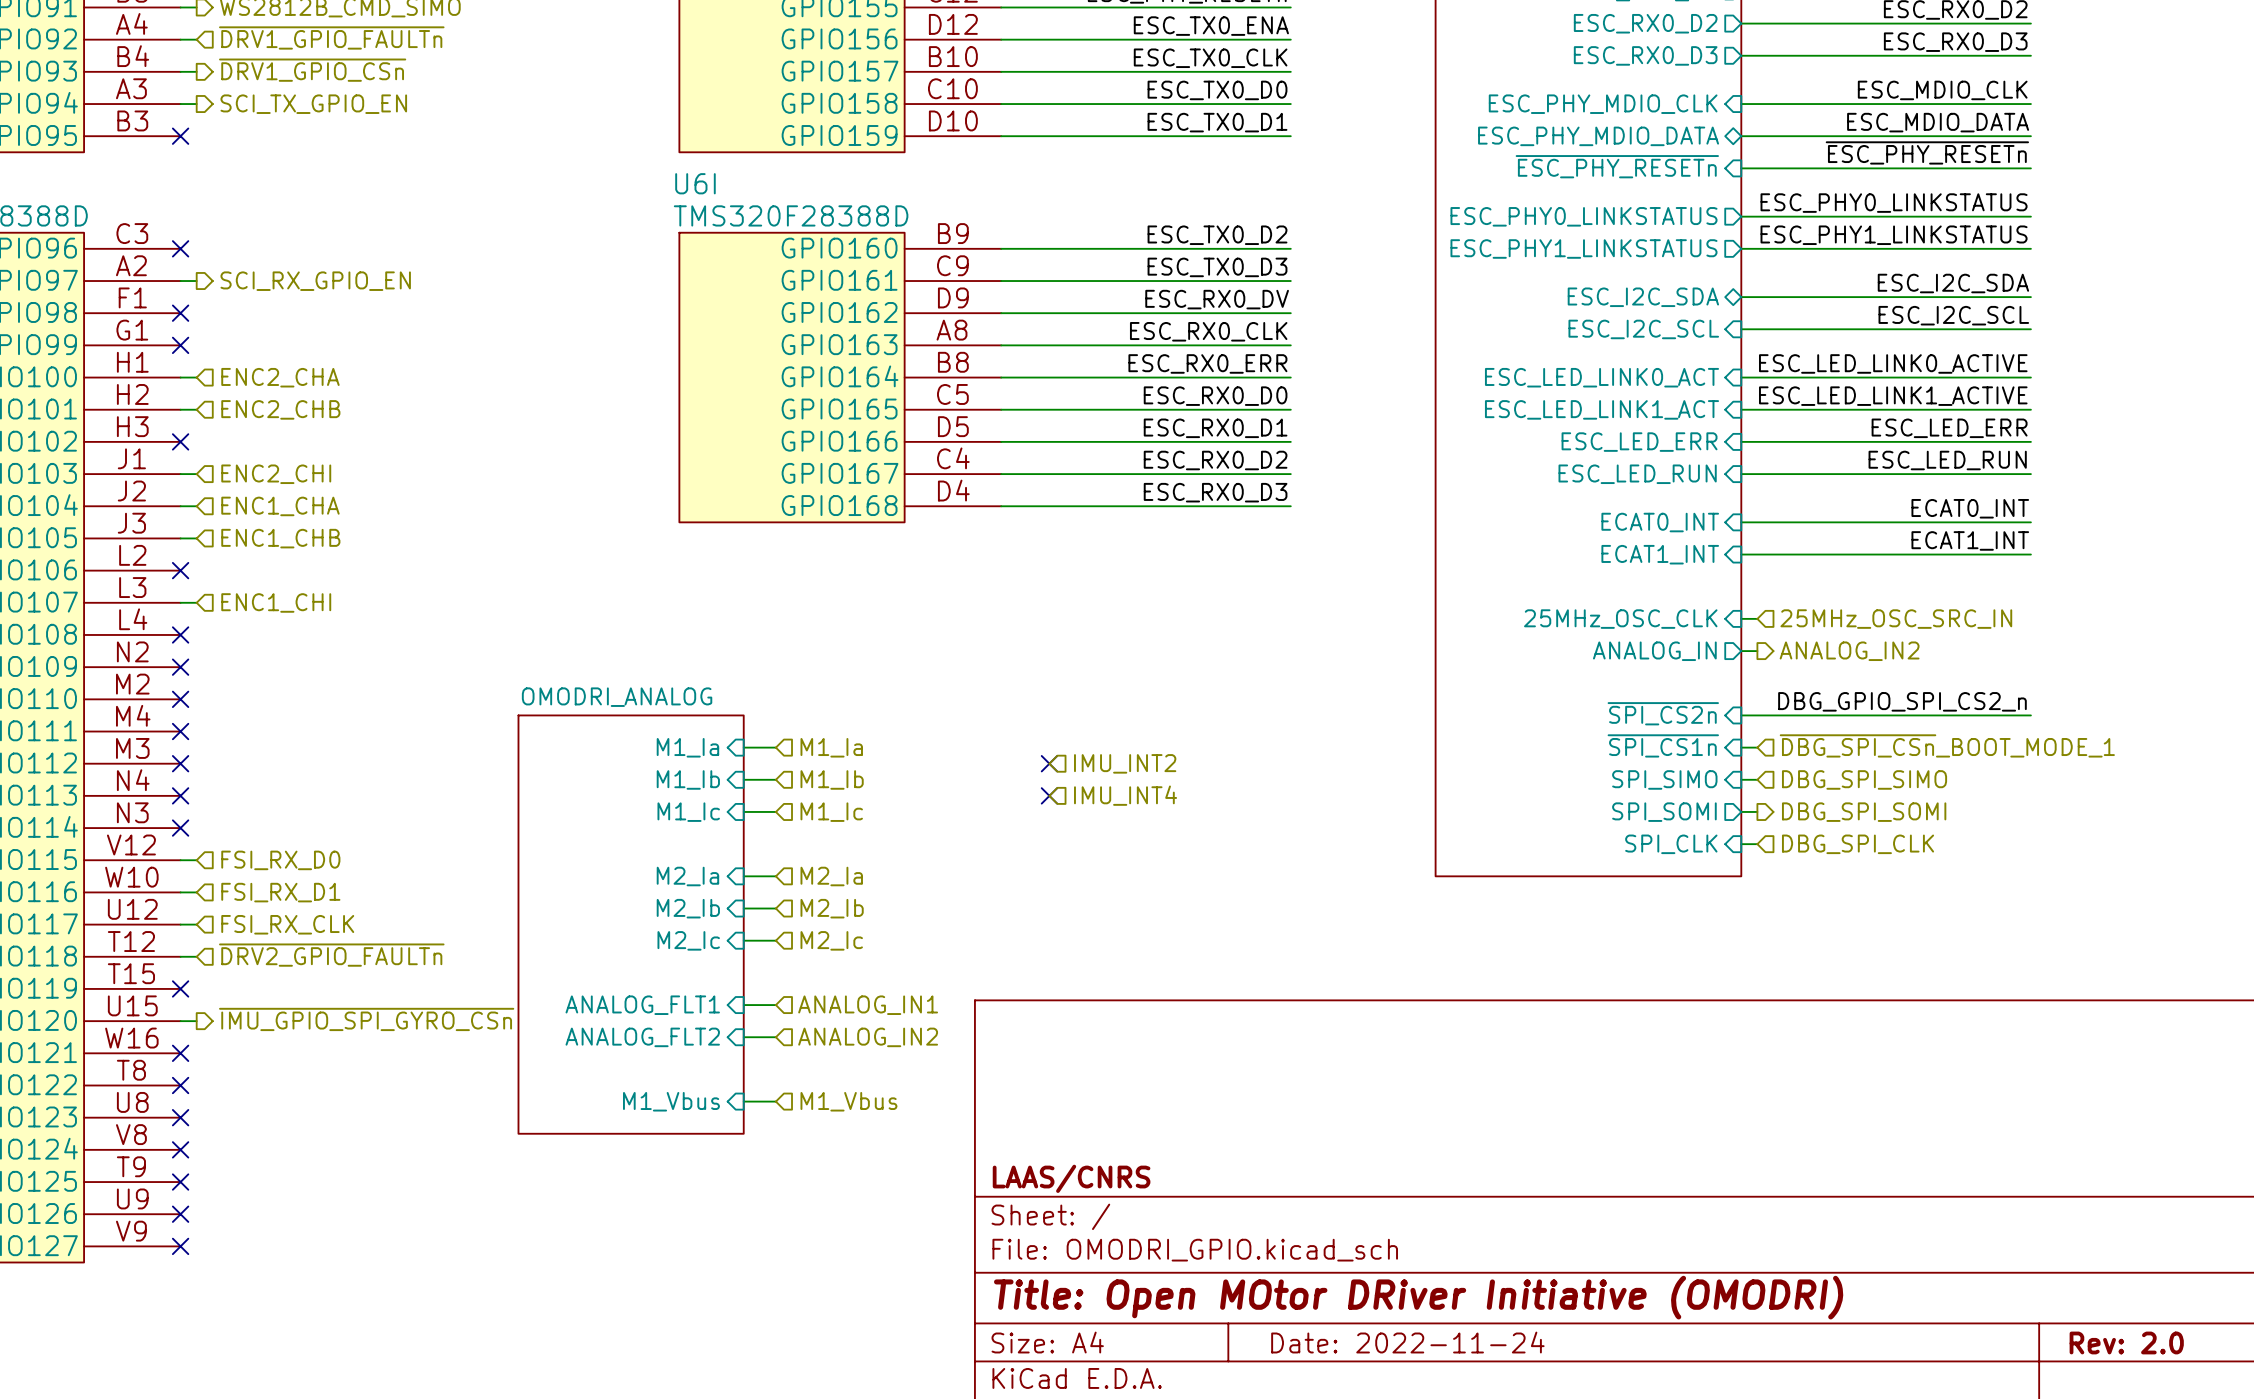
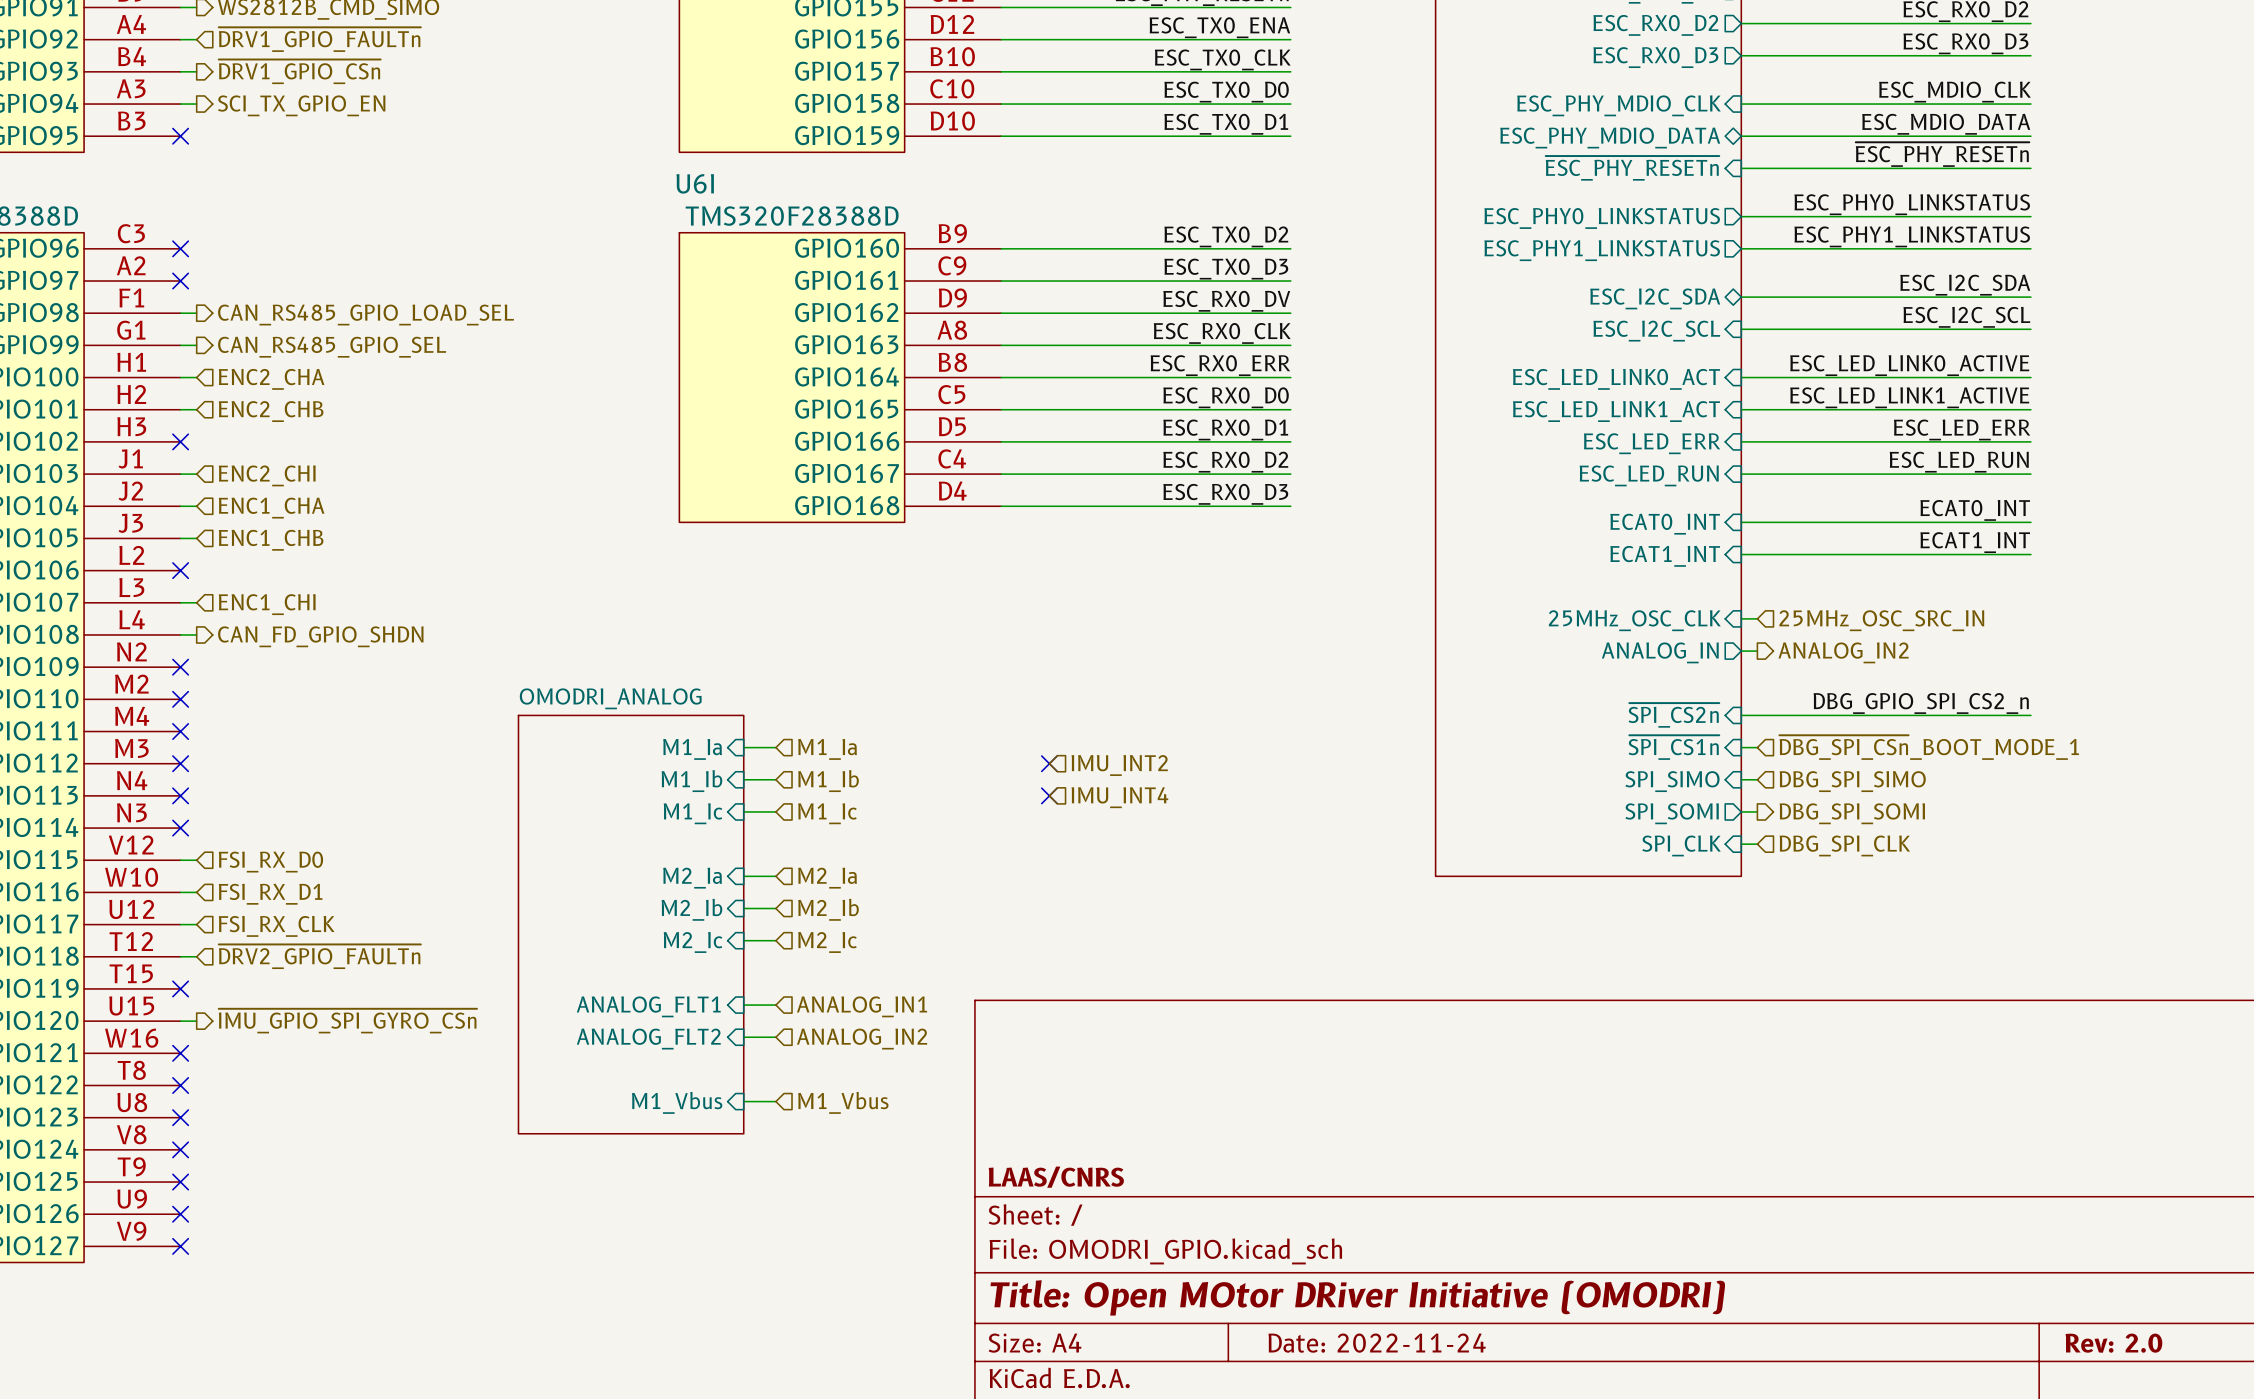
wire: (180, 281) (196, 281) -> (180, 313) (196, 313)
no-connect mark: none -> (180, 281)
hierarchical label: SCI_RX_GPIO_EN (315, 281) -> none
hierarchical label: none -> CAN_RS485_GPIO_LOAD_SEL (366, 314)
no-connect mark: (180, 313) -> none
wire: none -> (180, 345) (196, 345)
no-connect mark: (180, 345) -> none
hierarchical label: none -> CAN_RS485_GPIO_SEL (332, 347)
wire: none -> (180, 634) (196, 634)
no-connect mark: (180, 634) -> none
hierarchical label: none -> CAN_FD_GPIO_SHDN (320, 636)

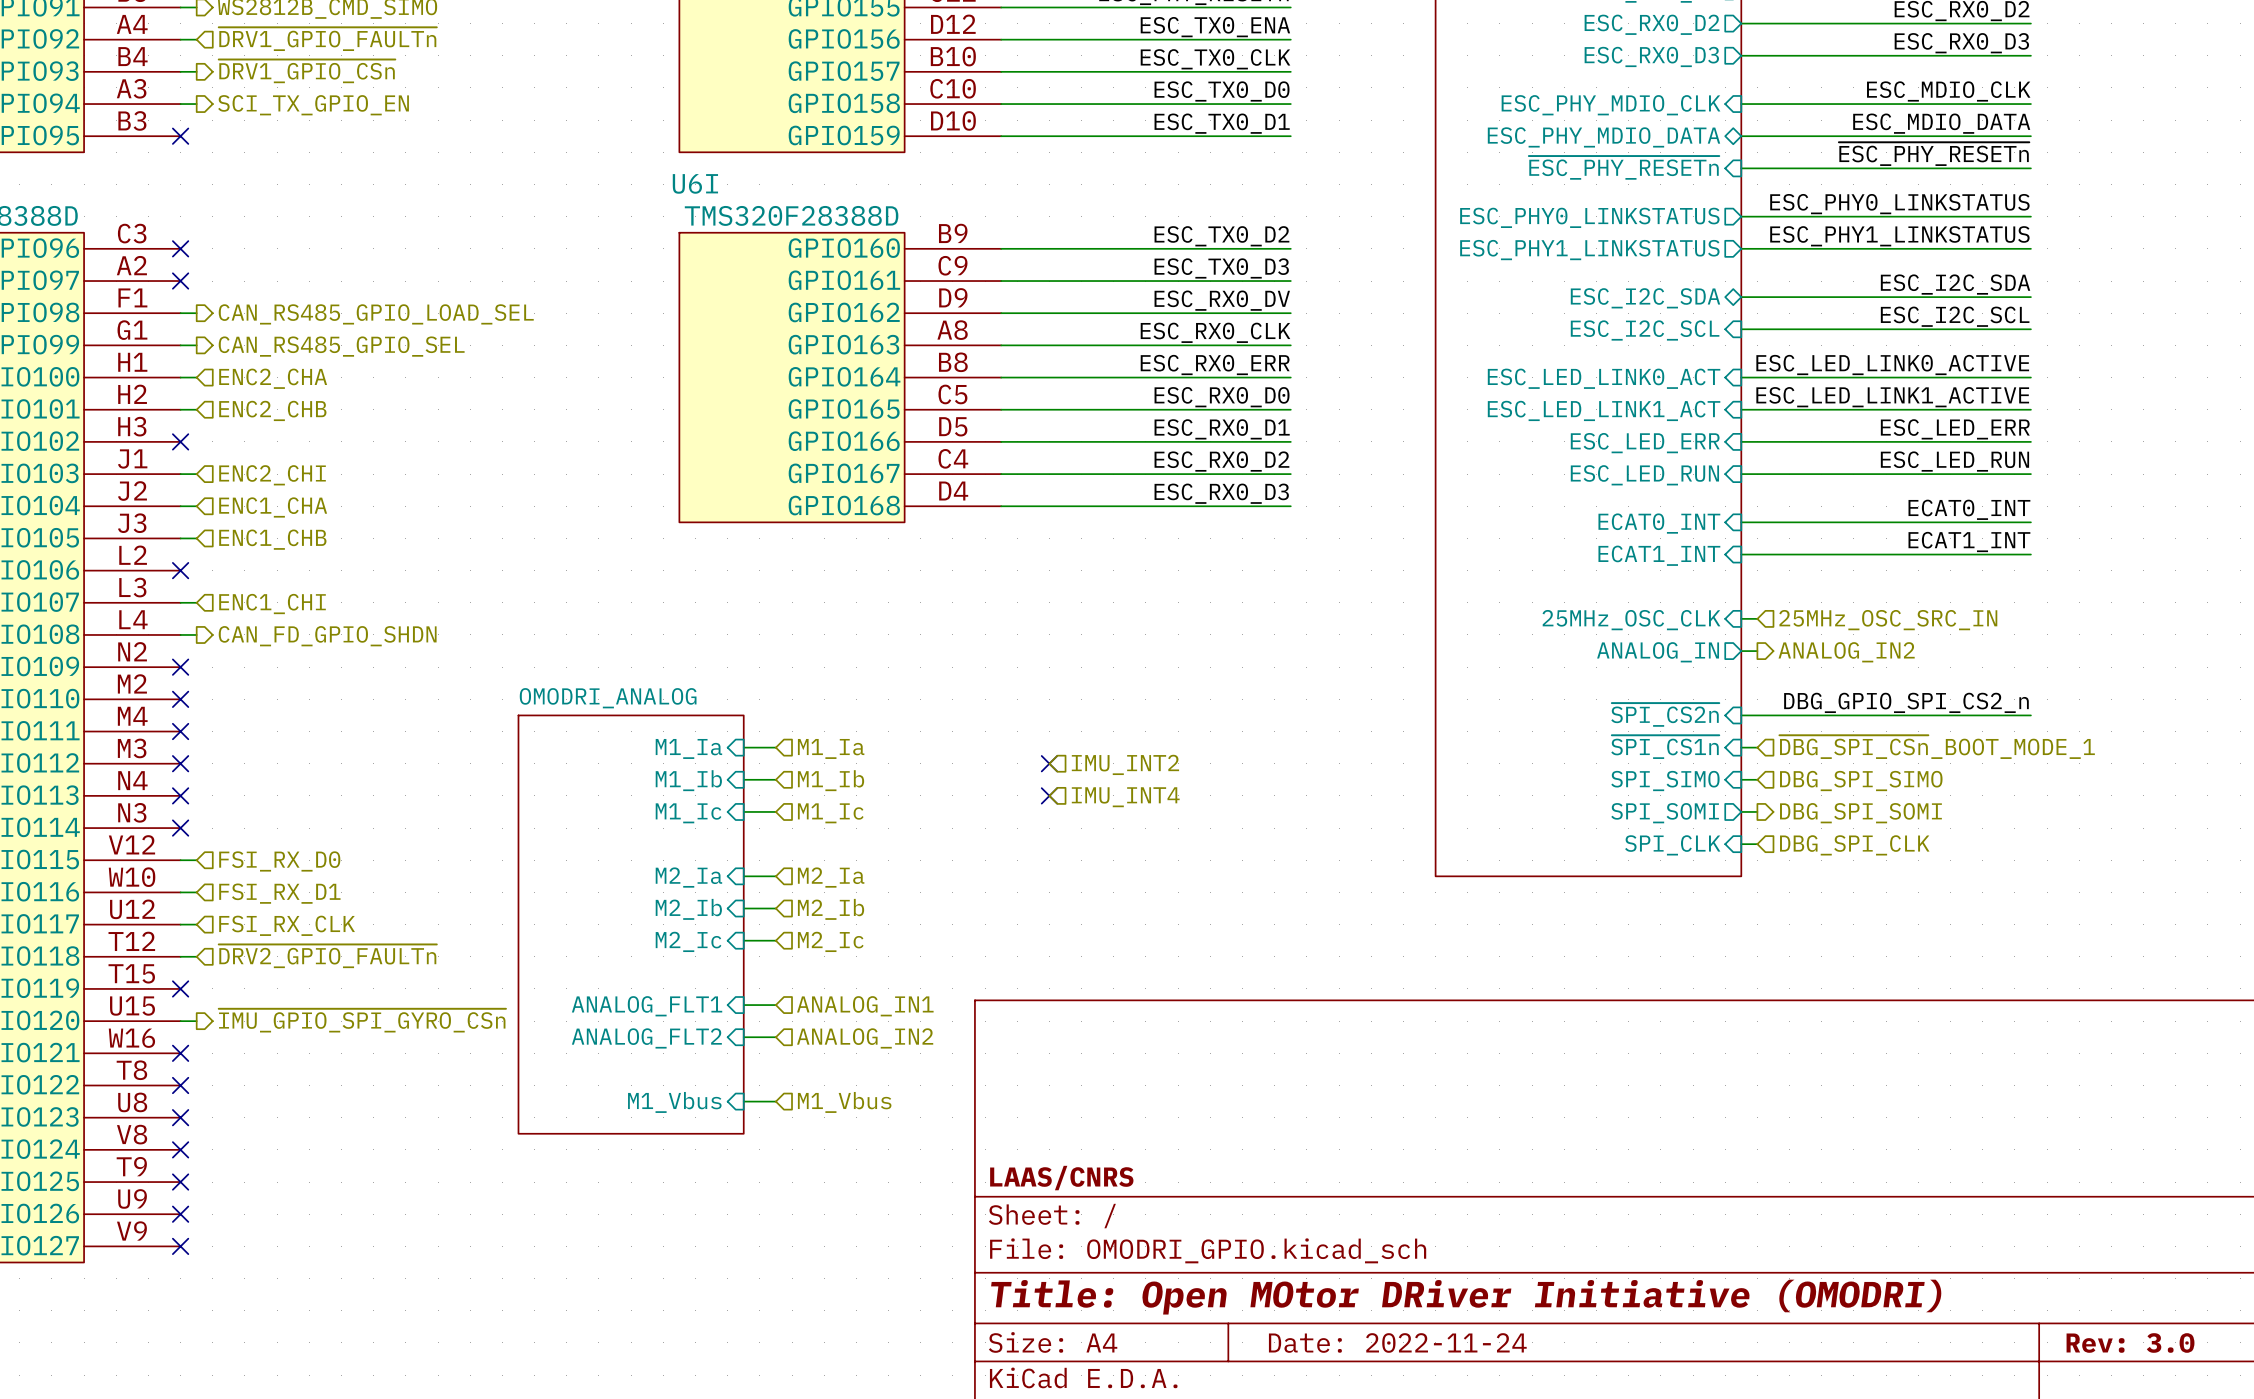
title block: Rev: 2.0 (2113, 1343) -> Rev: 3.0 (2130, 1342)

